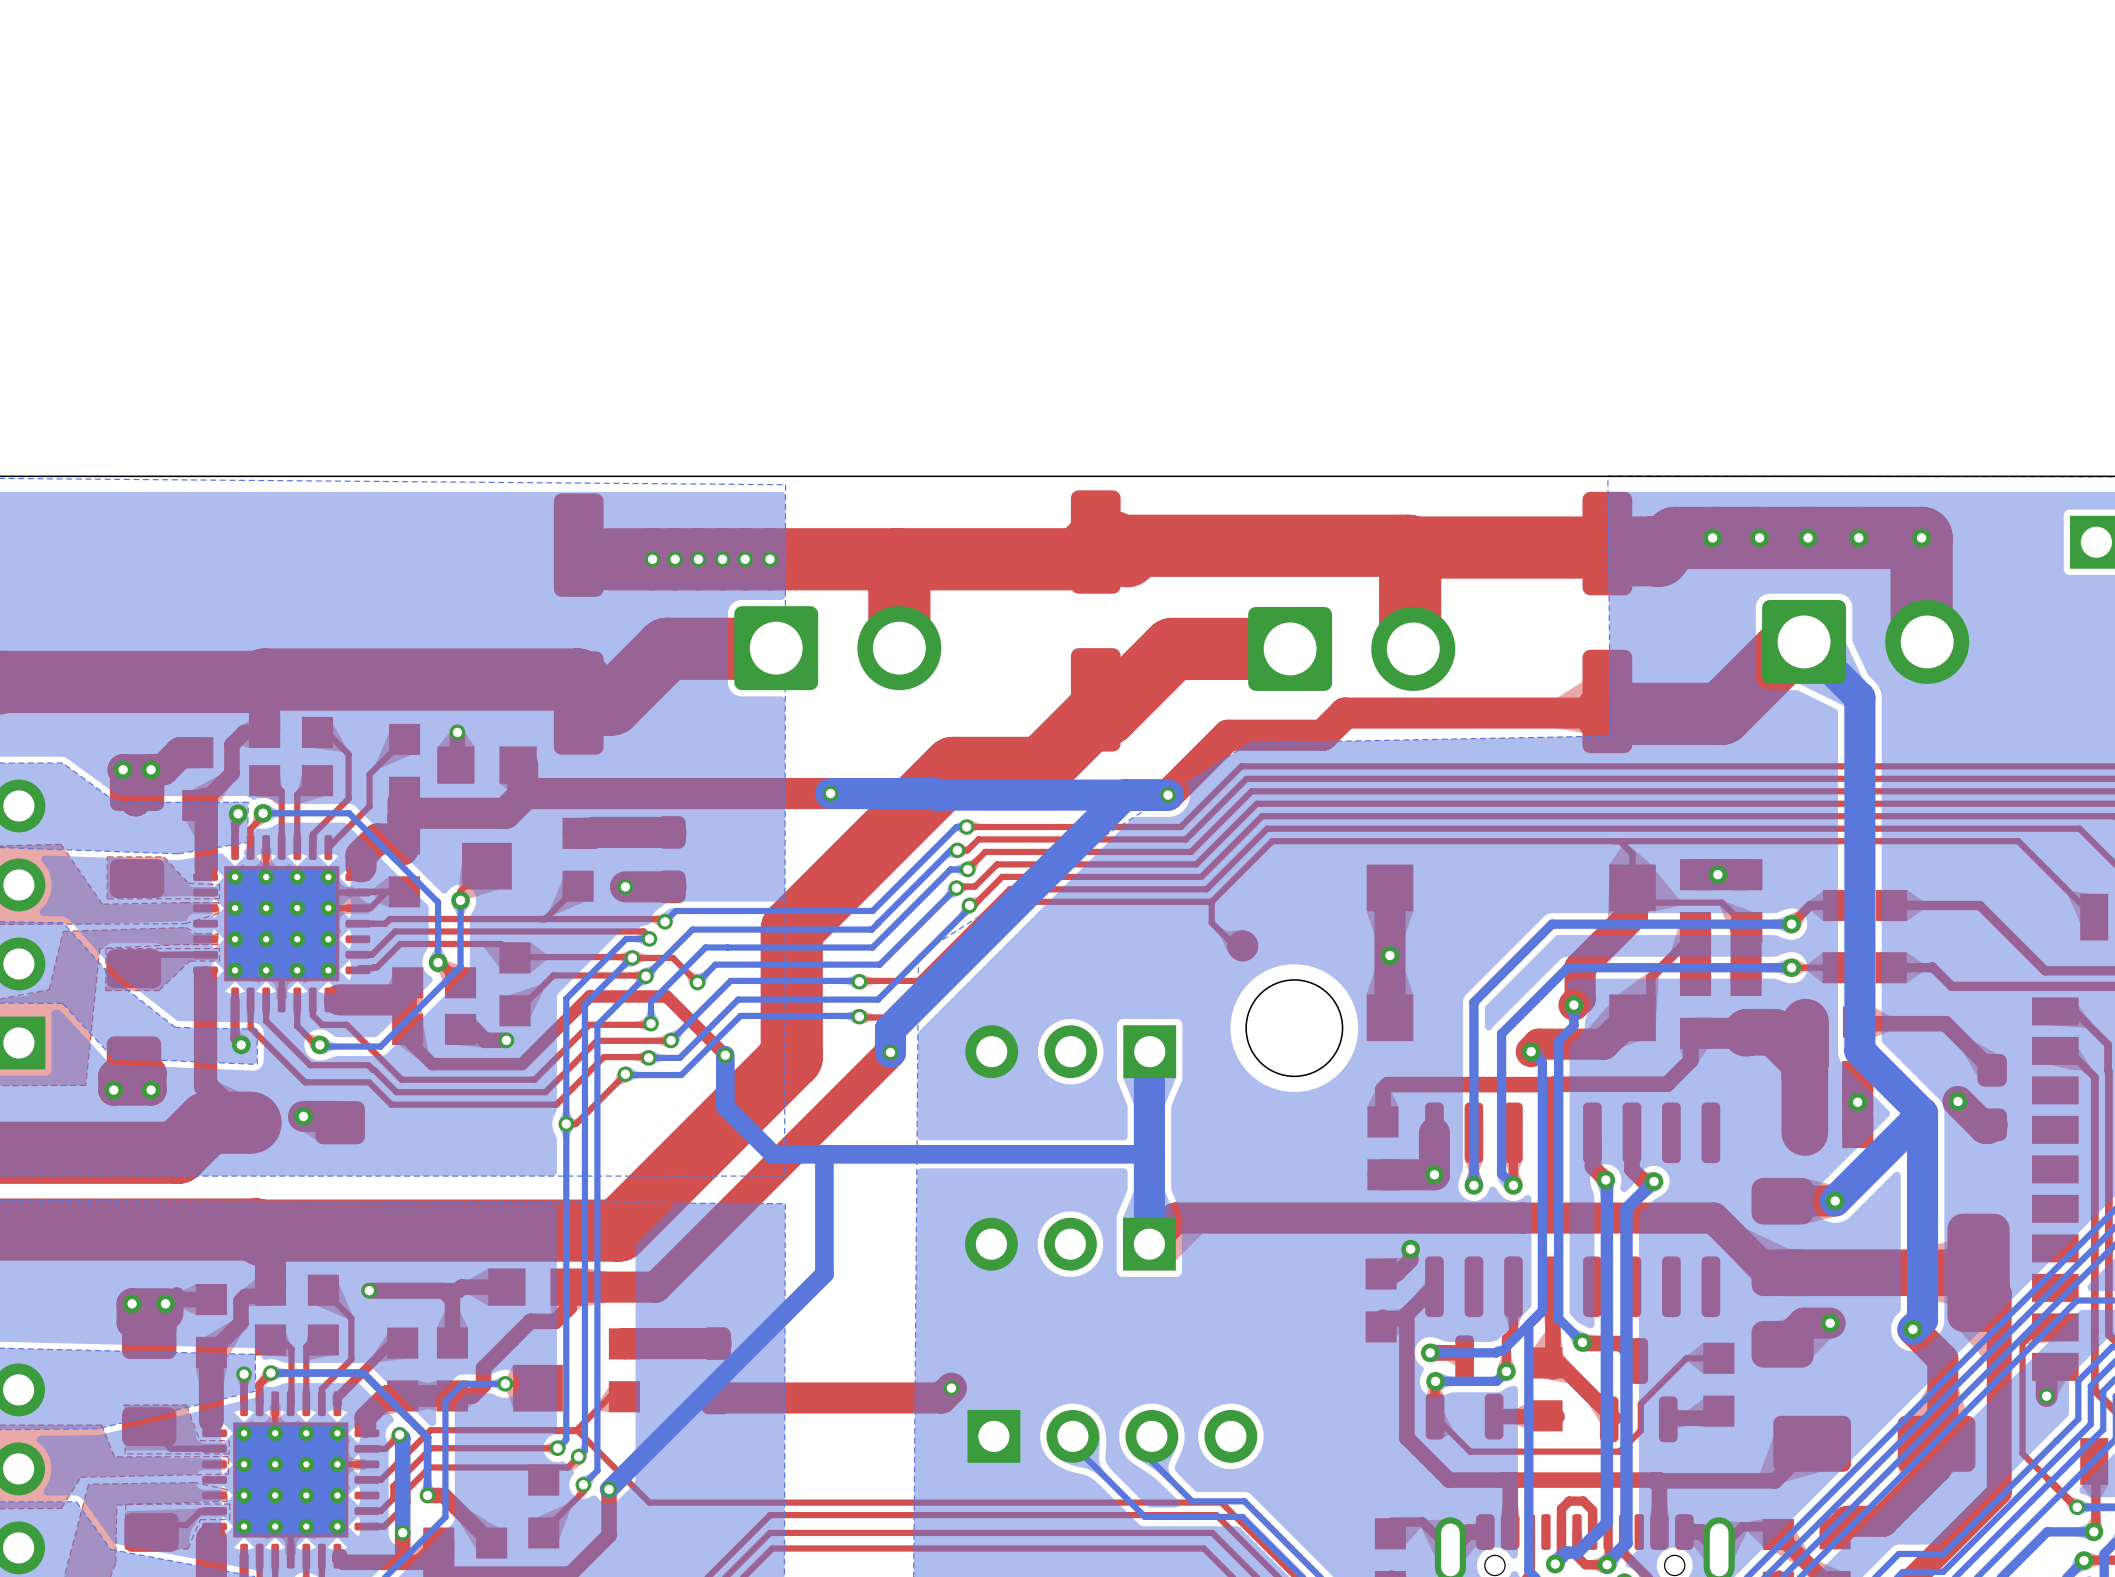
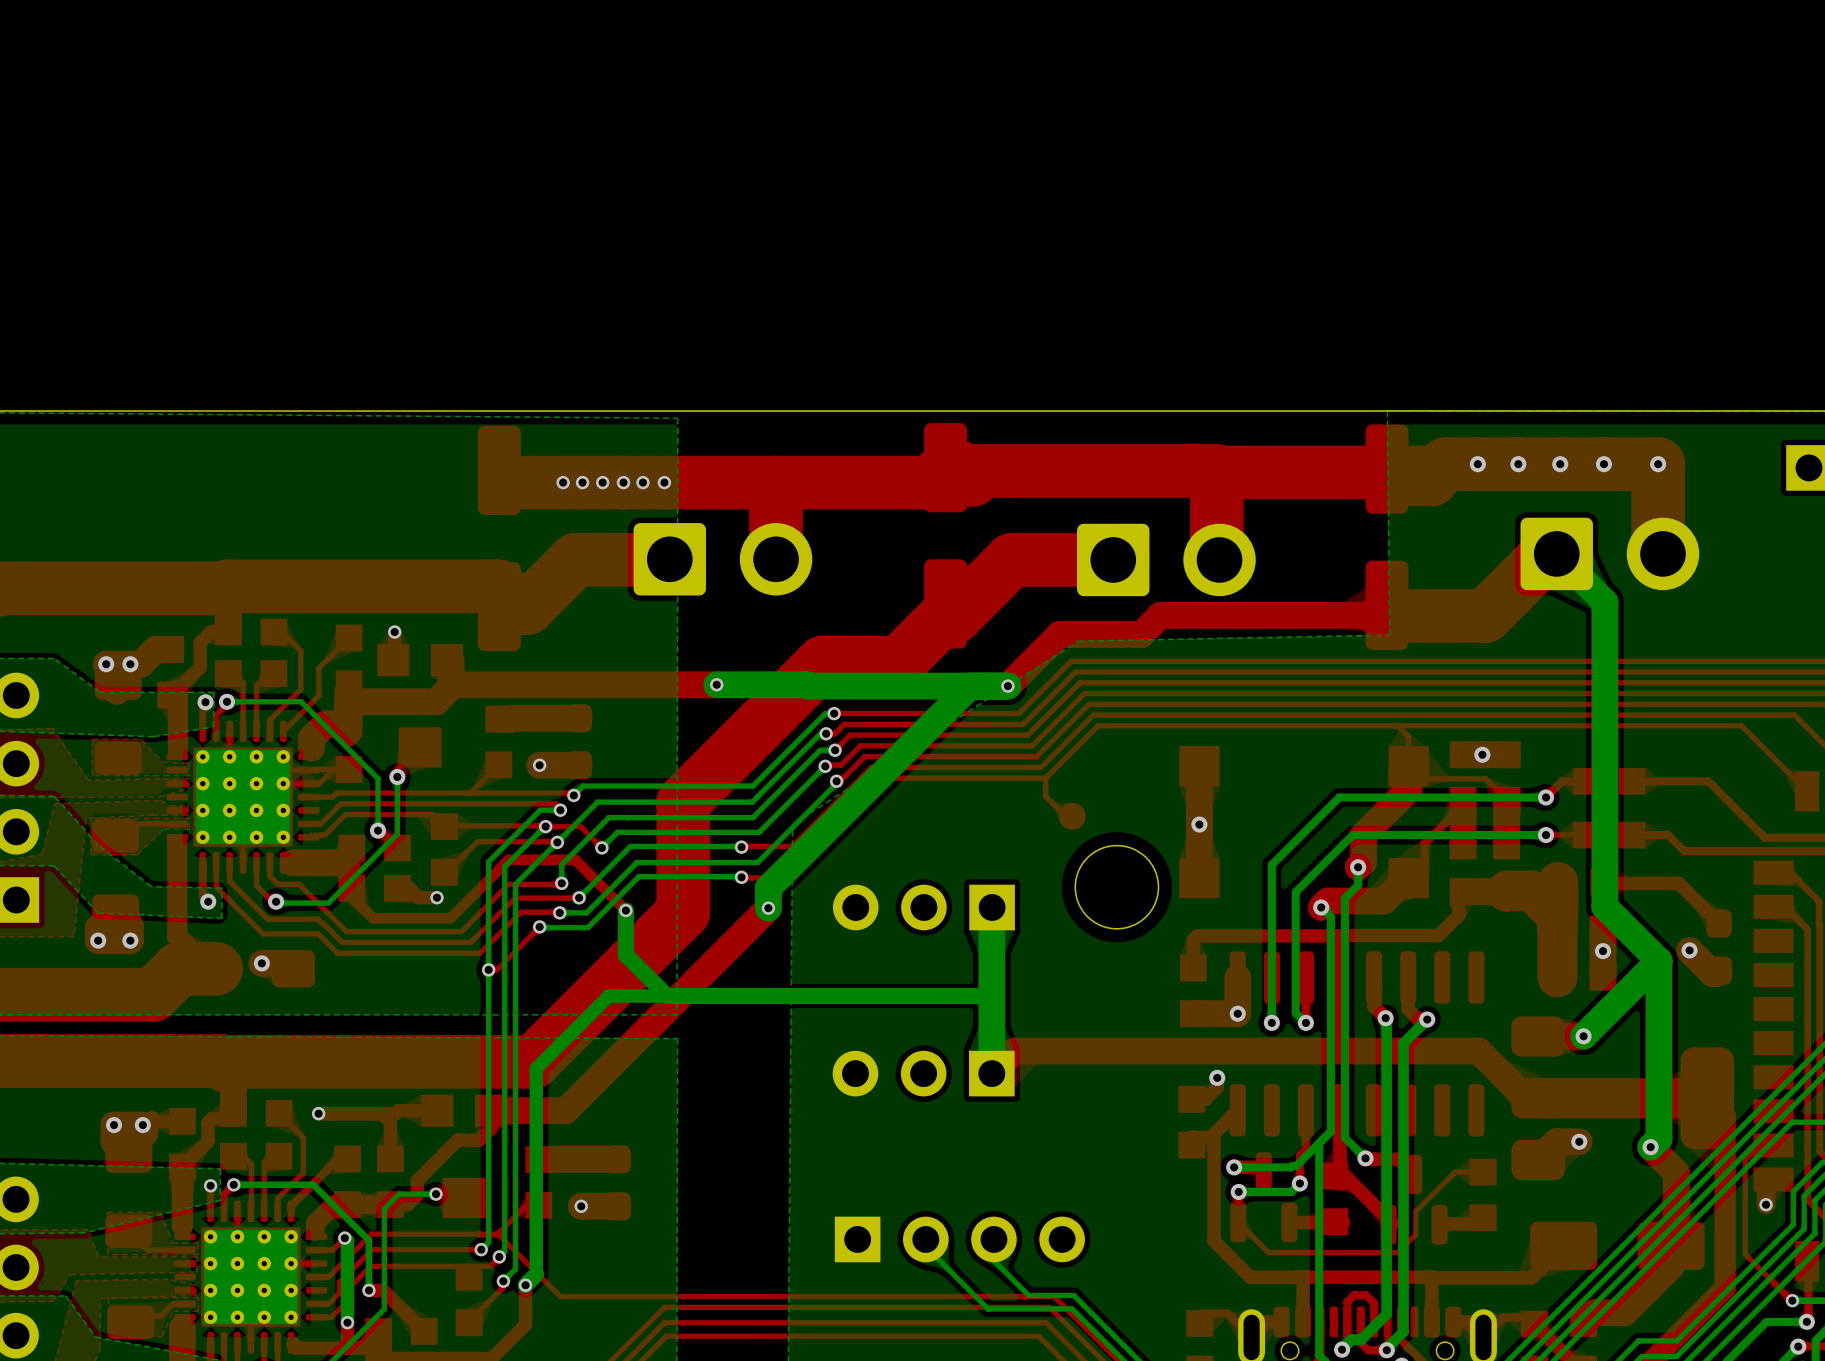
bottom track: (824, 1154) (824, 1274) (621, 1476) -> (667, 996) (608, 996) (536, 1068) (536, 1274)
top track: (951, 1388) (941, 1397) (716, 1397) -> (581, 1206) (617, 1206)
via: (951, 1388) -> none
via: none -> (581, 1206)

